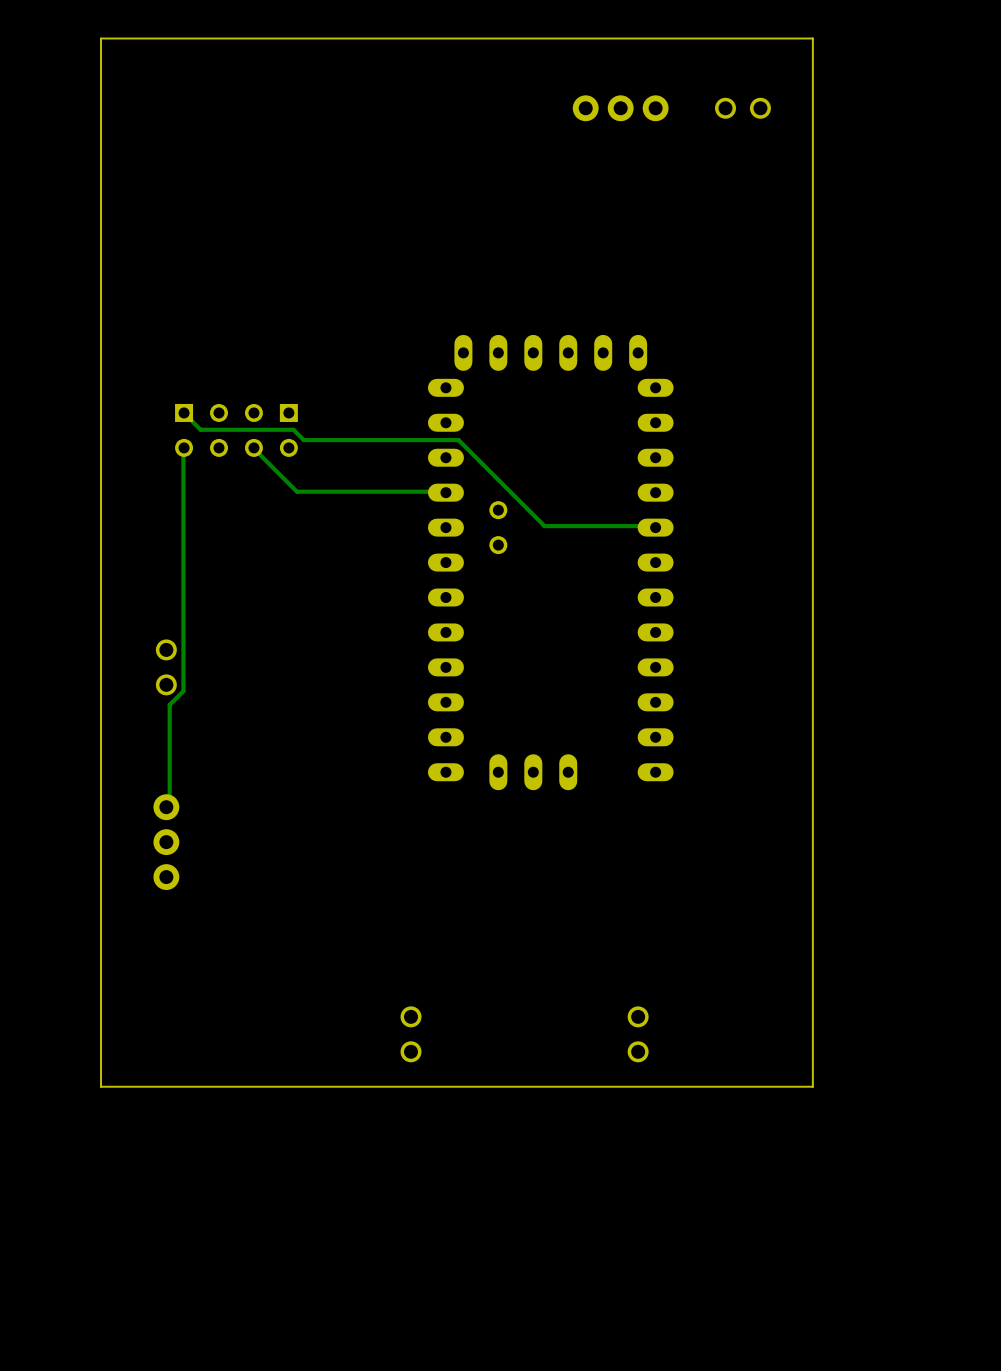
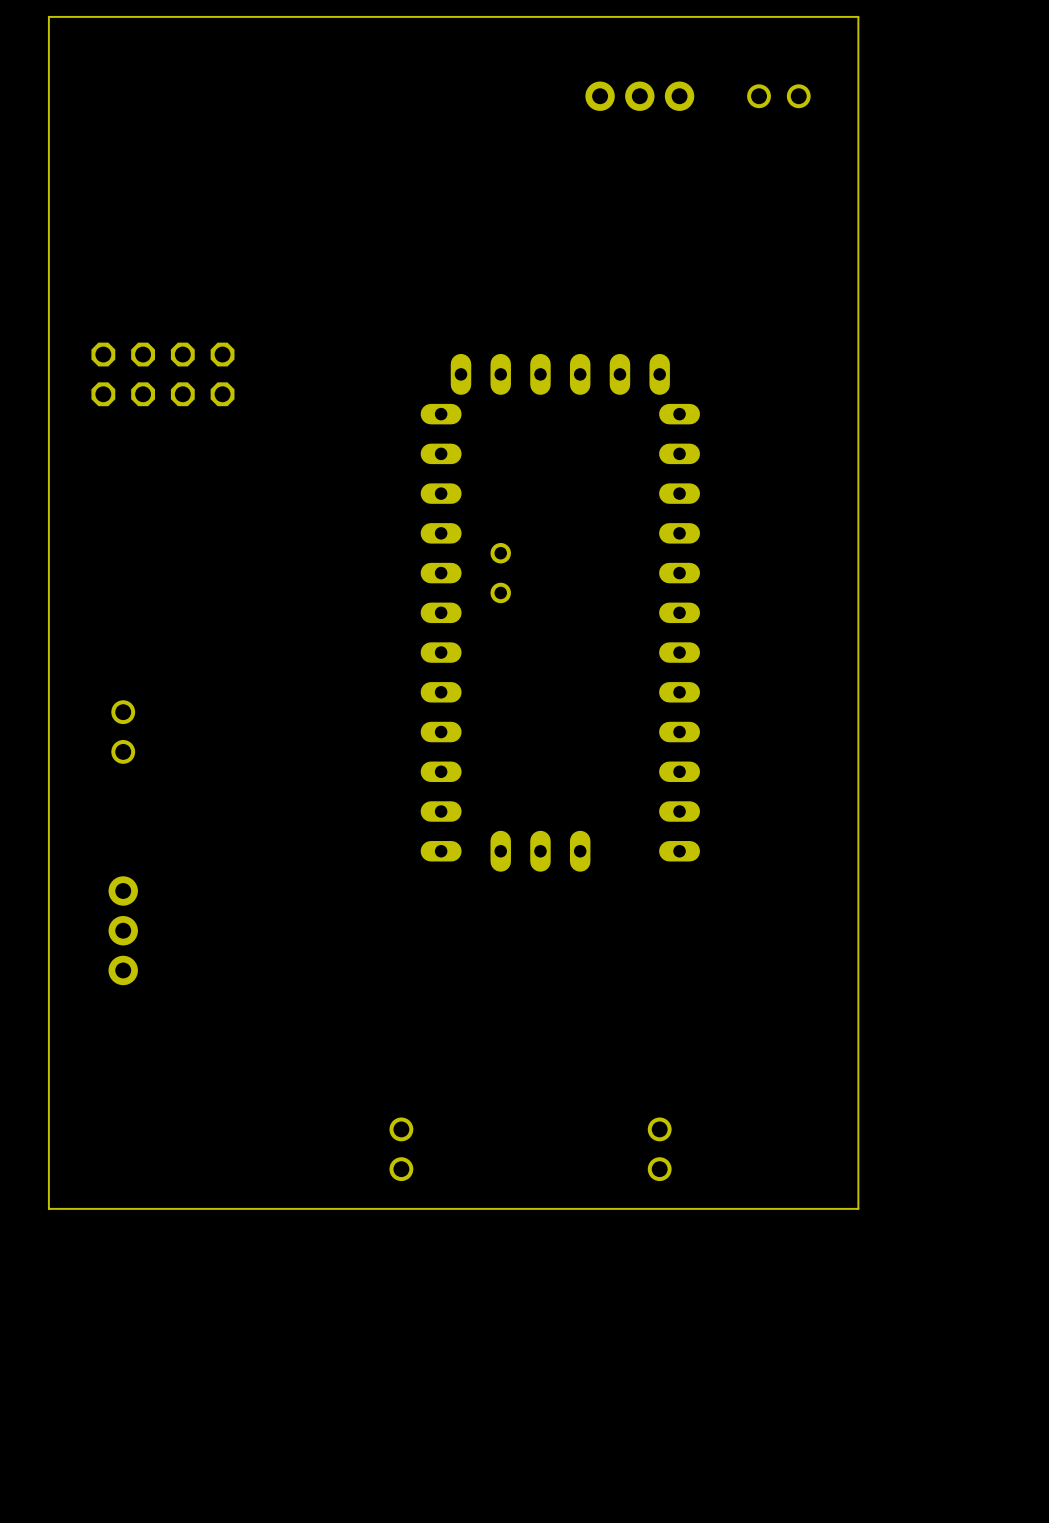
part: none -> (162, 374)
track: (184, 412) (200, 429) (293, 429) (303, 440) (458, 440) (544, 526) (654, 526) (655, 527) -> none
part: (236, 430) -> none
track: (184, 447) (183, 691) (169, 704) (169, 804) (166, 807) -> none
track: (253, 447) (296, 491) (445, 492) -> none

